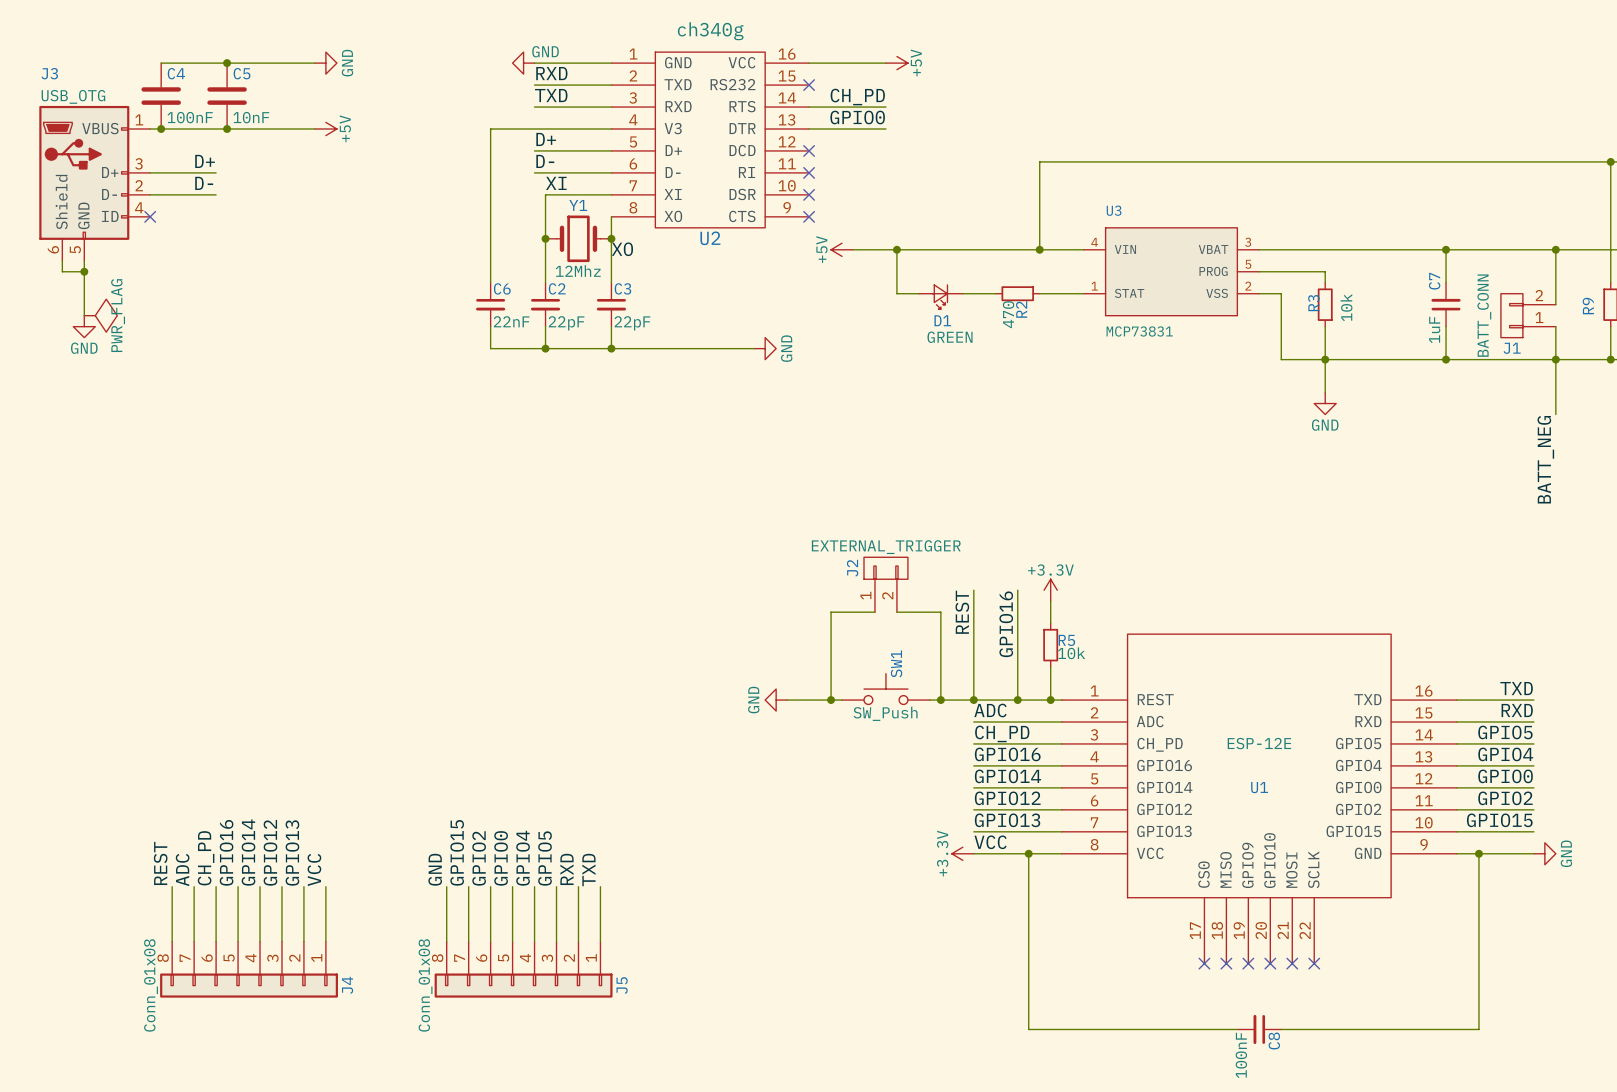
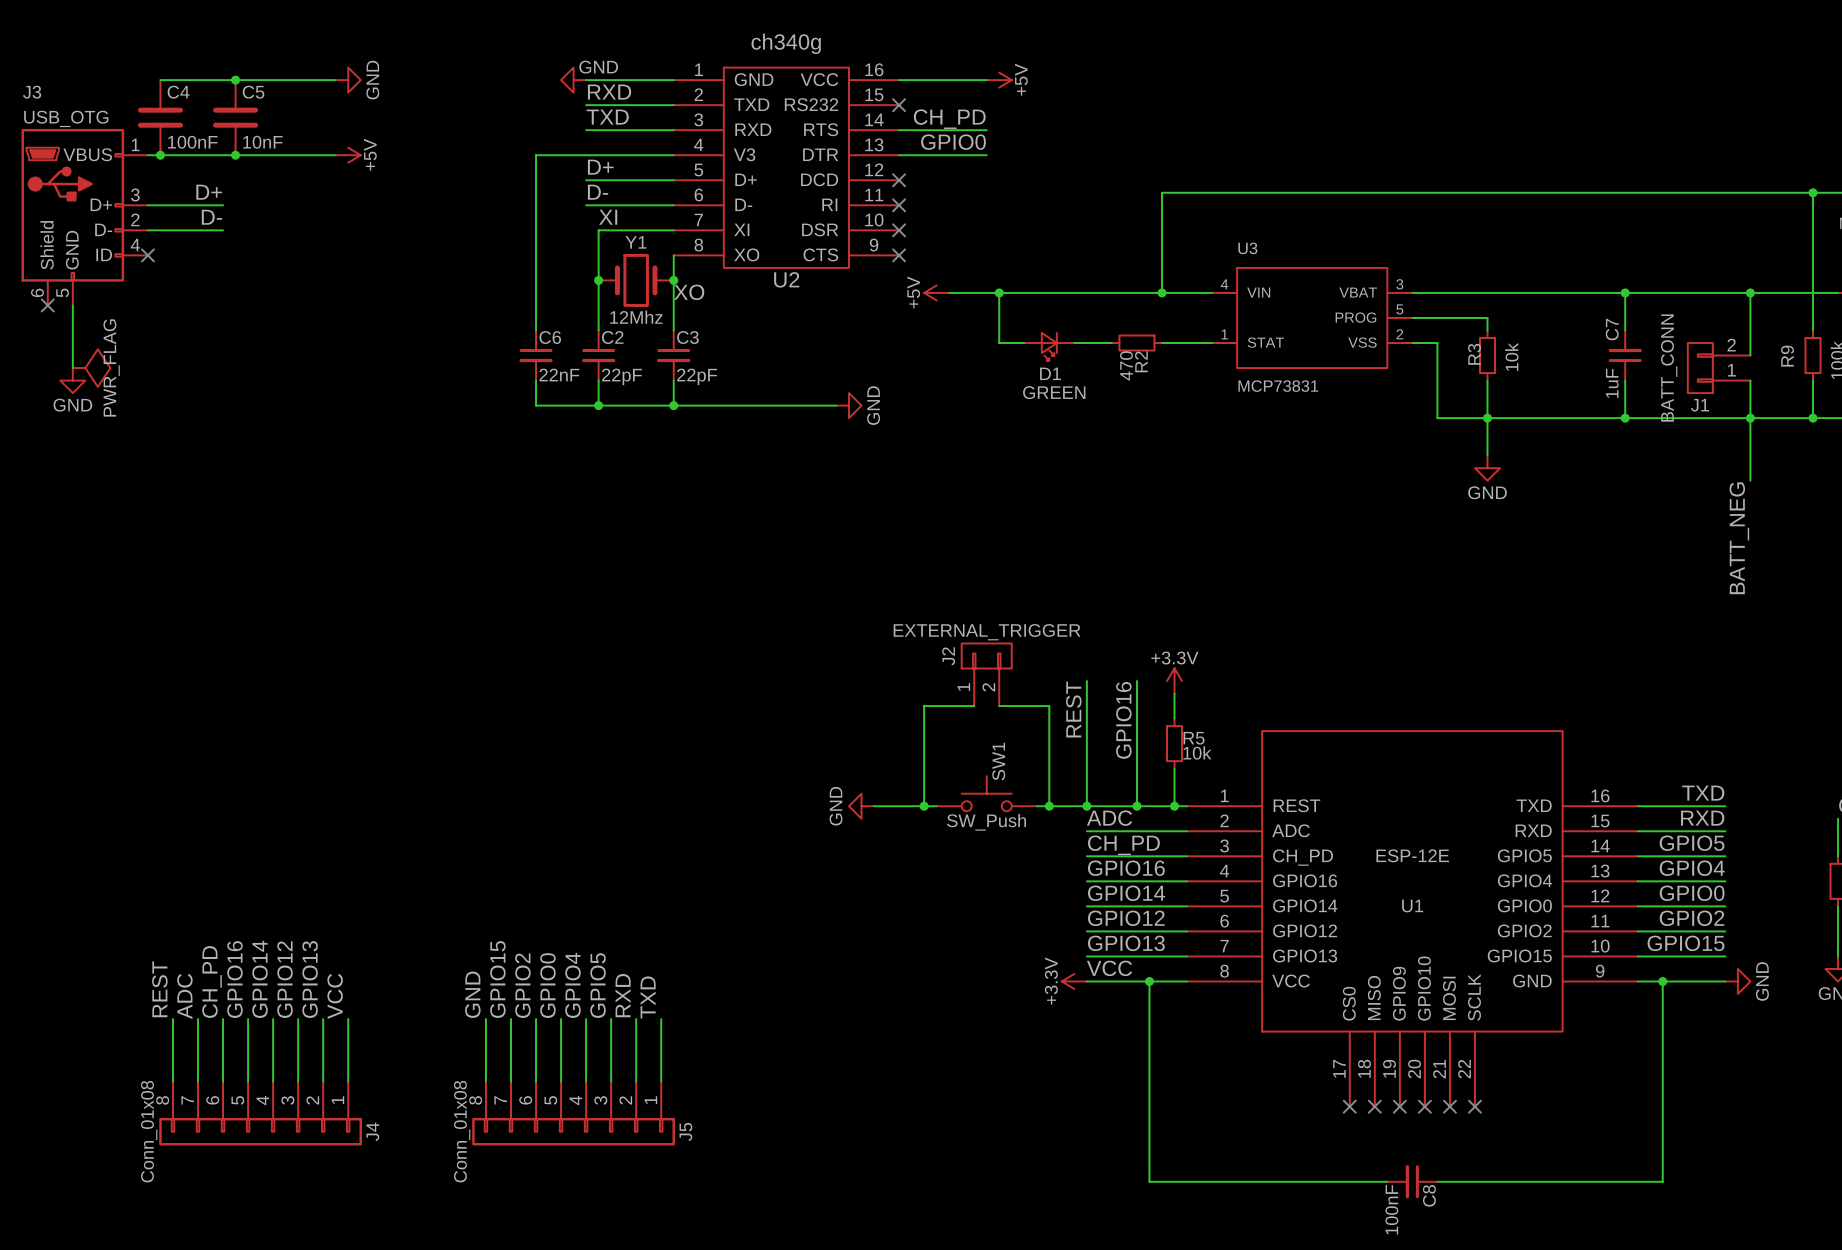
wire: (62, 260) (62, 271) (84, 271) -> none
no-connect mark: none -> (47, 305)
junction: (84, 271) -> none

